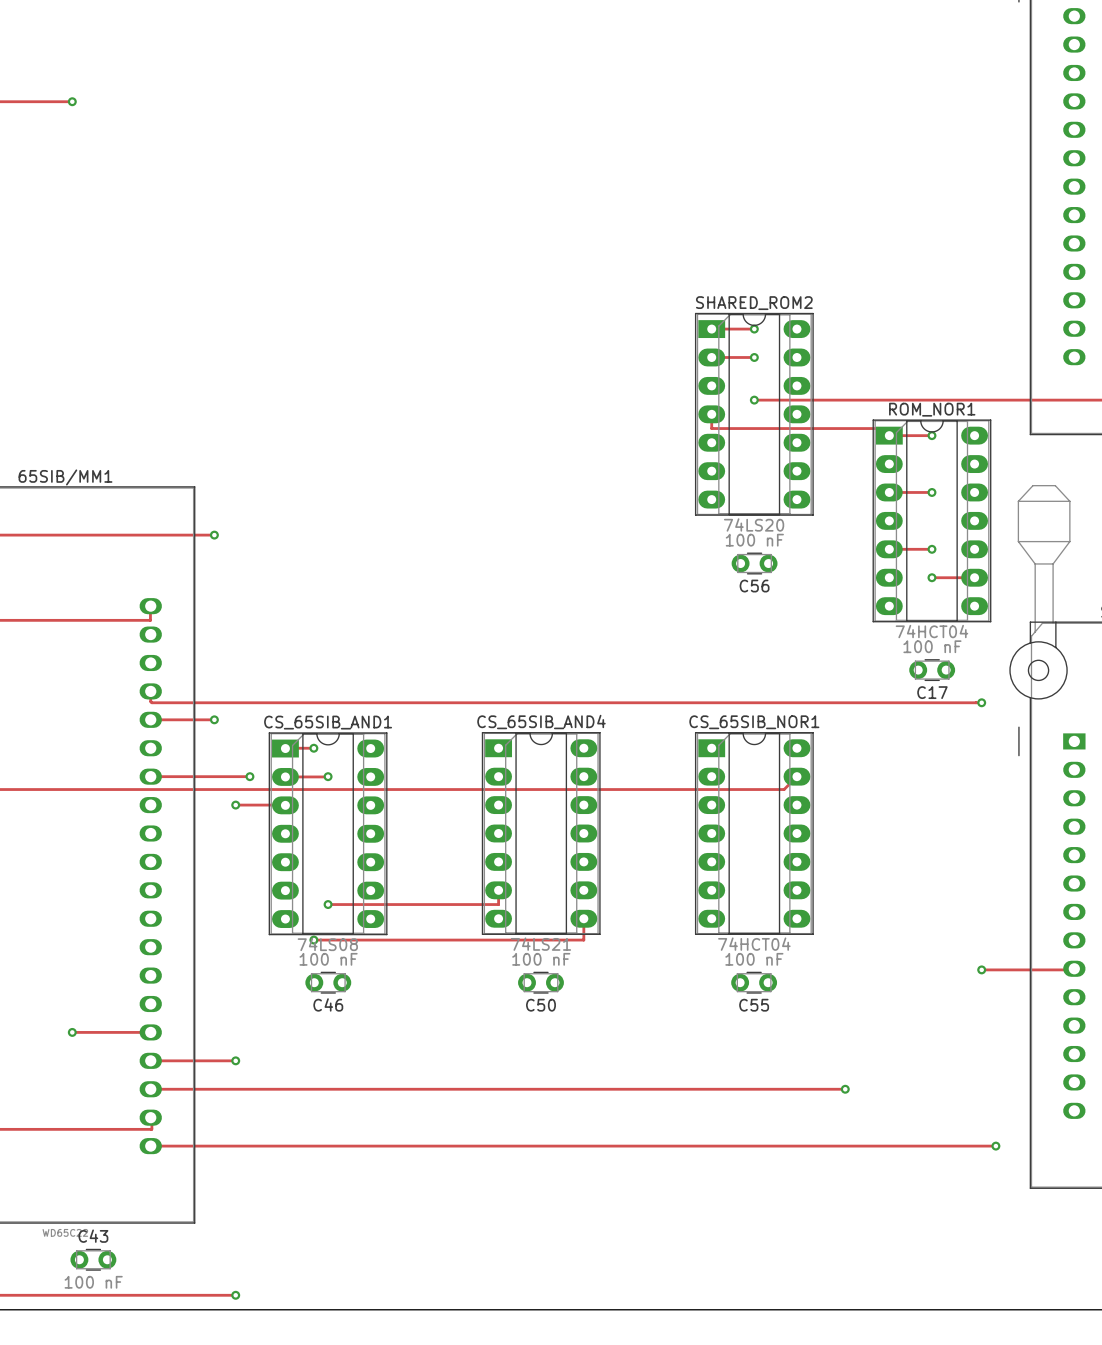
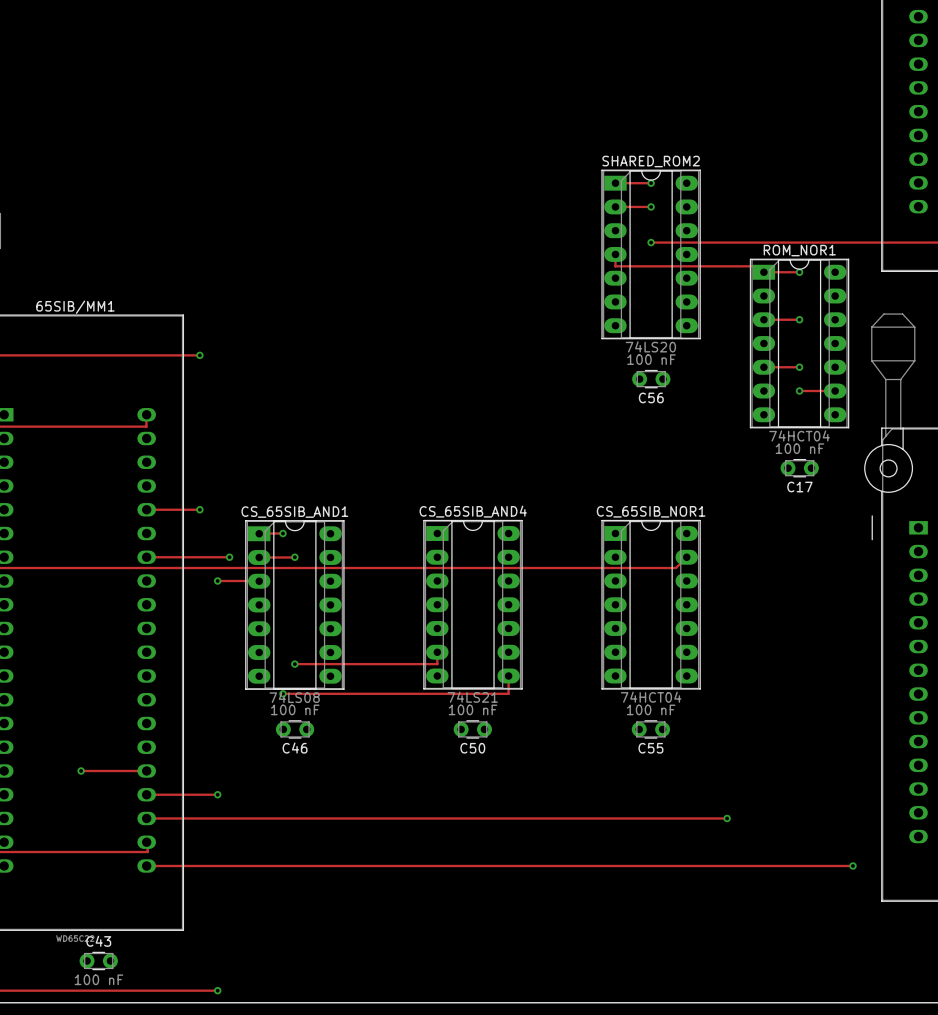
track: (150, 691) (151, 702) (981, 702) -> none
via: (981, 702) -> none
track: (1074, 968) (981, 969) -> none
via: (981, 969) -> none

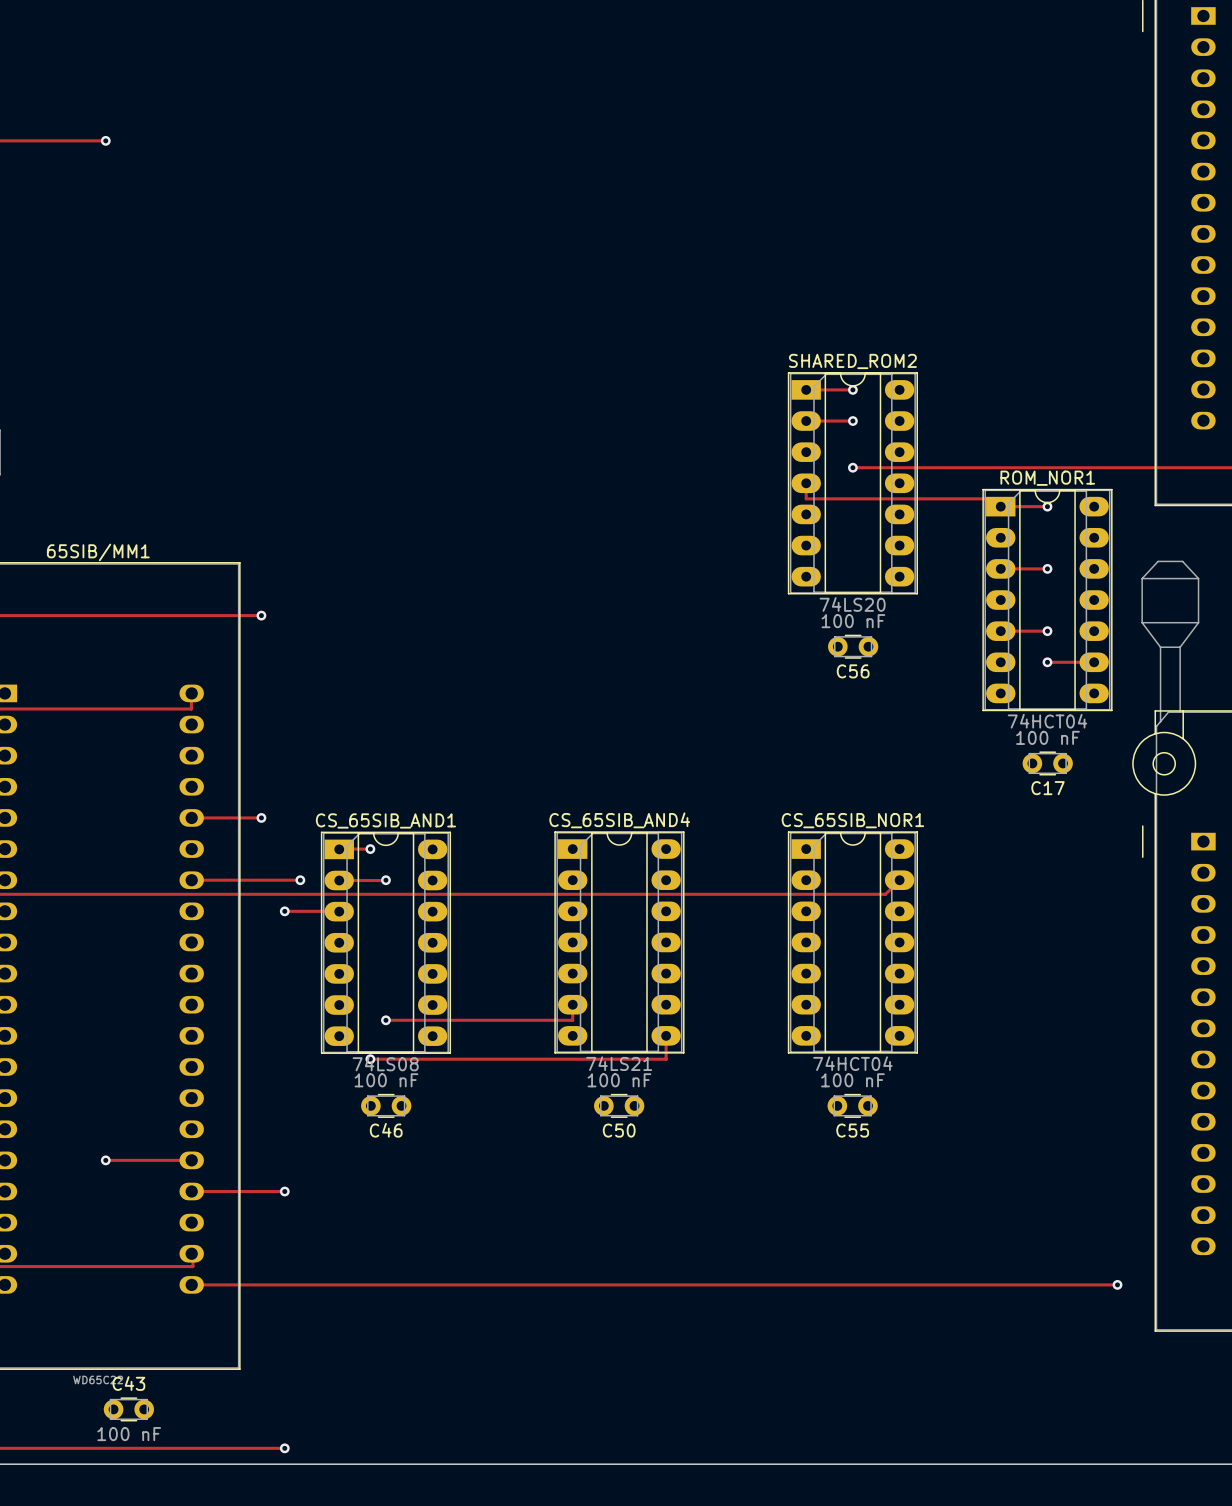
track: (146, 818) (727, 818) -> none
via: (727, 818) -> none

